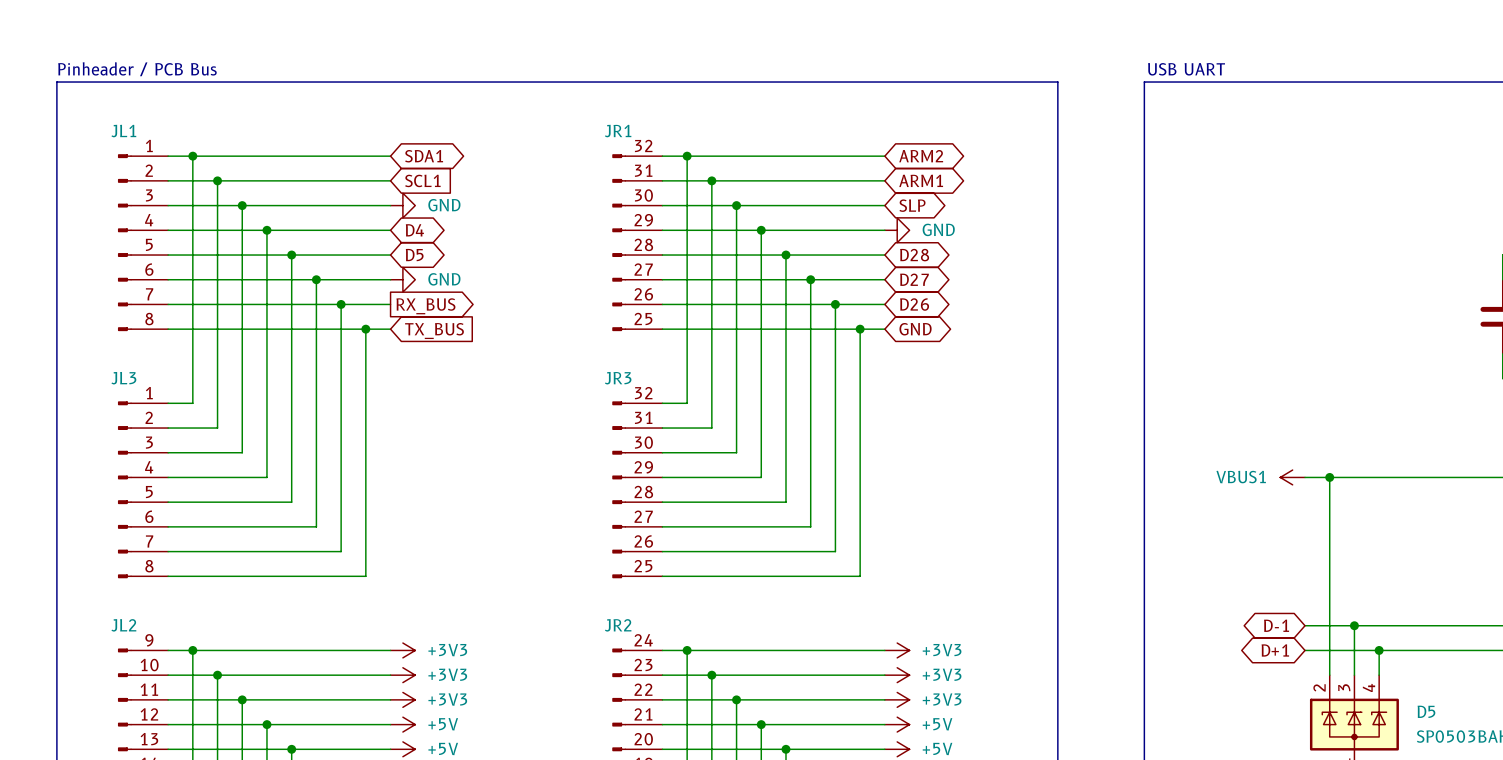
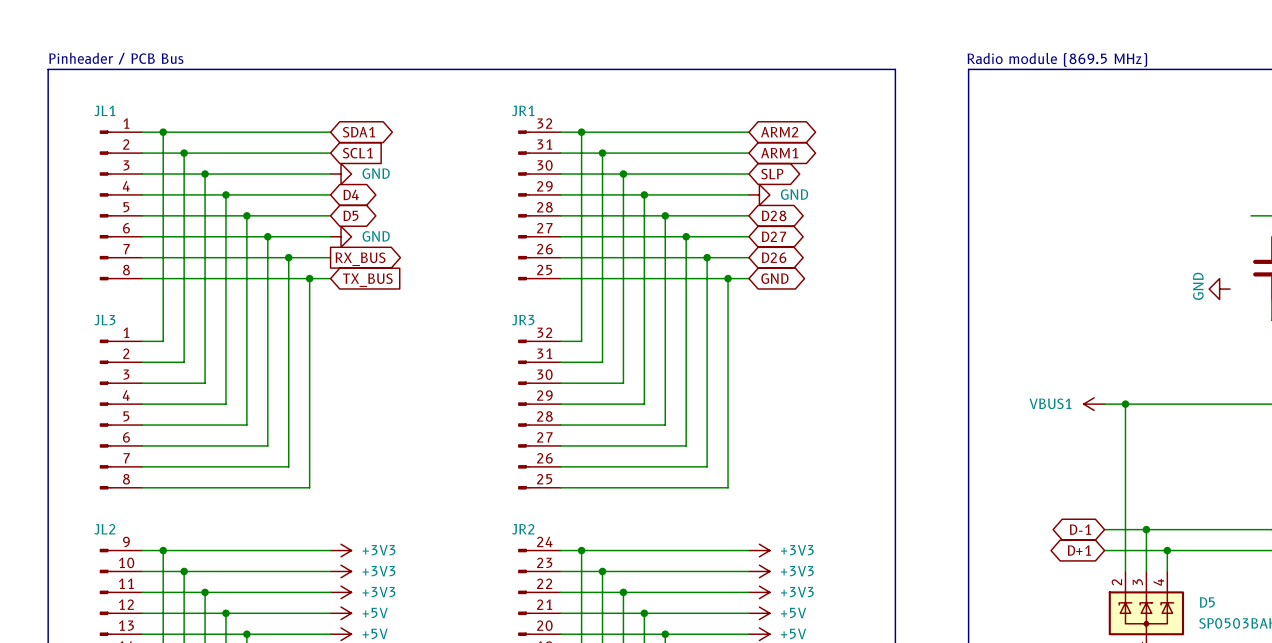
text: USB UART (1186, 69) -> Radio module (869.5 MHz) (1057, 59)
wire: (1502, 255) (1502, 279) -> (1271, 215) (1251, 215)
power symbol: none -> GND (1219, 289)

